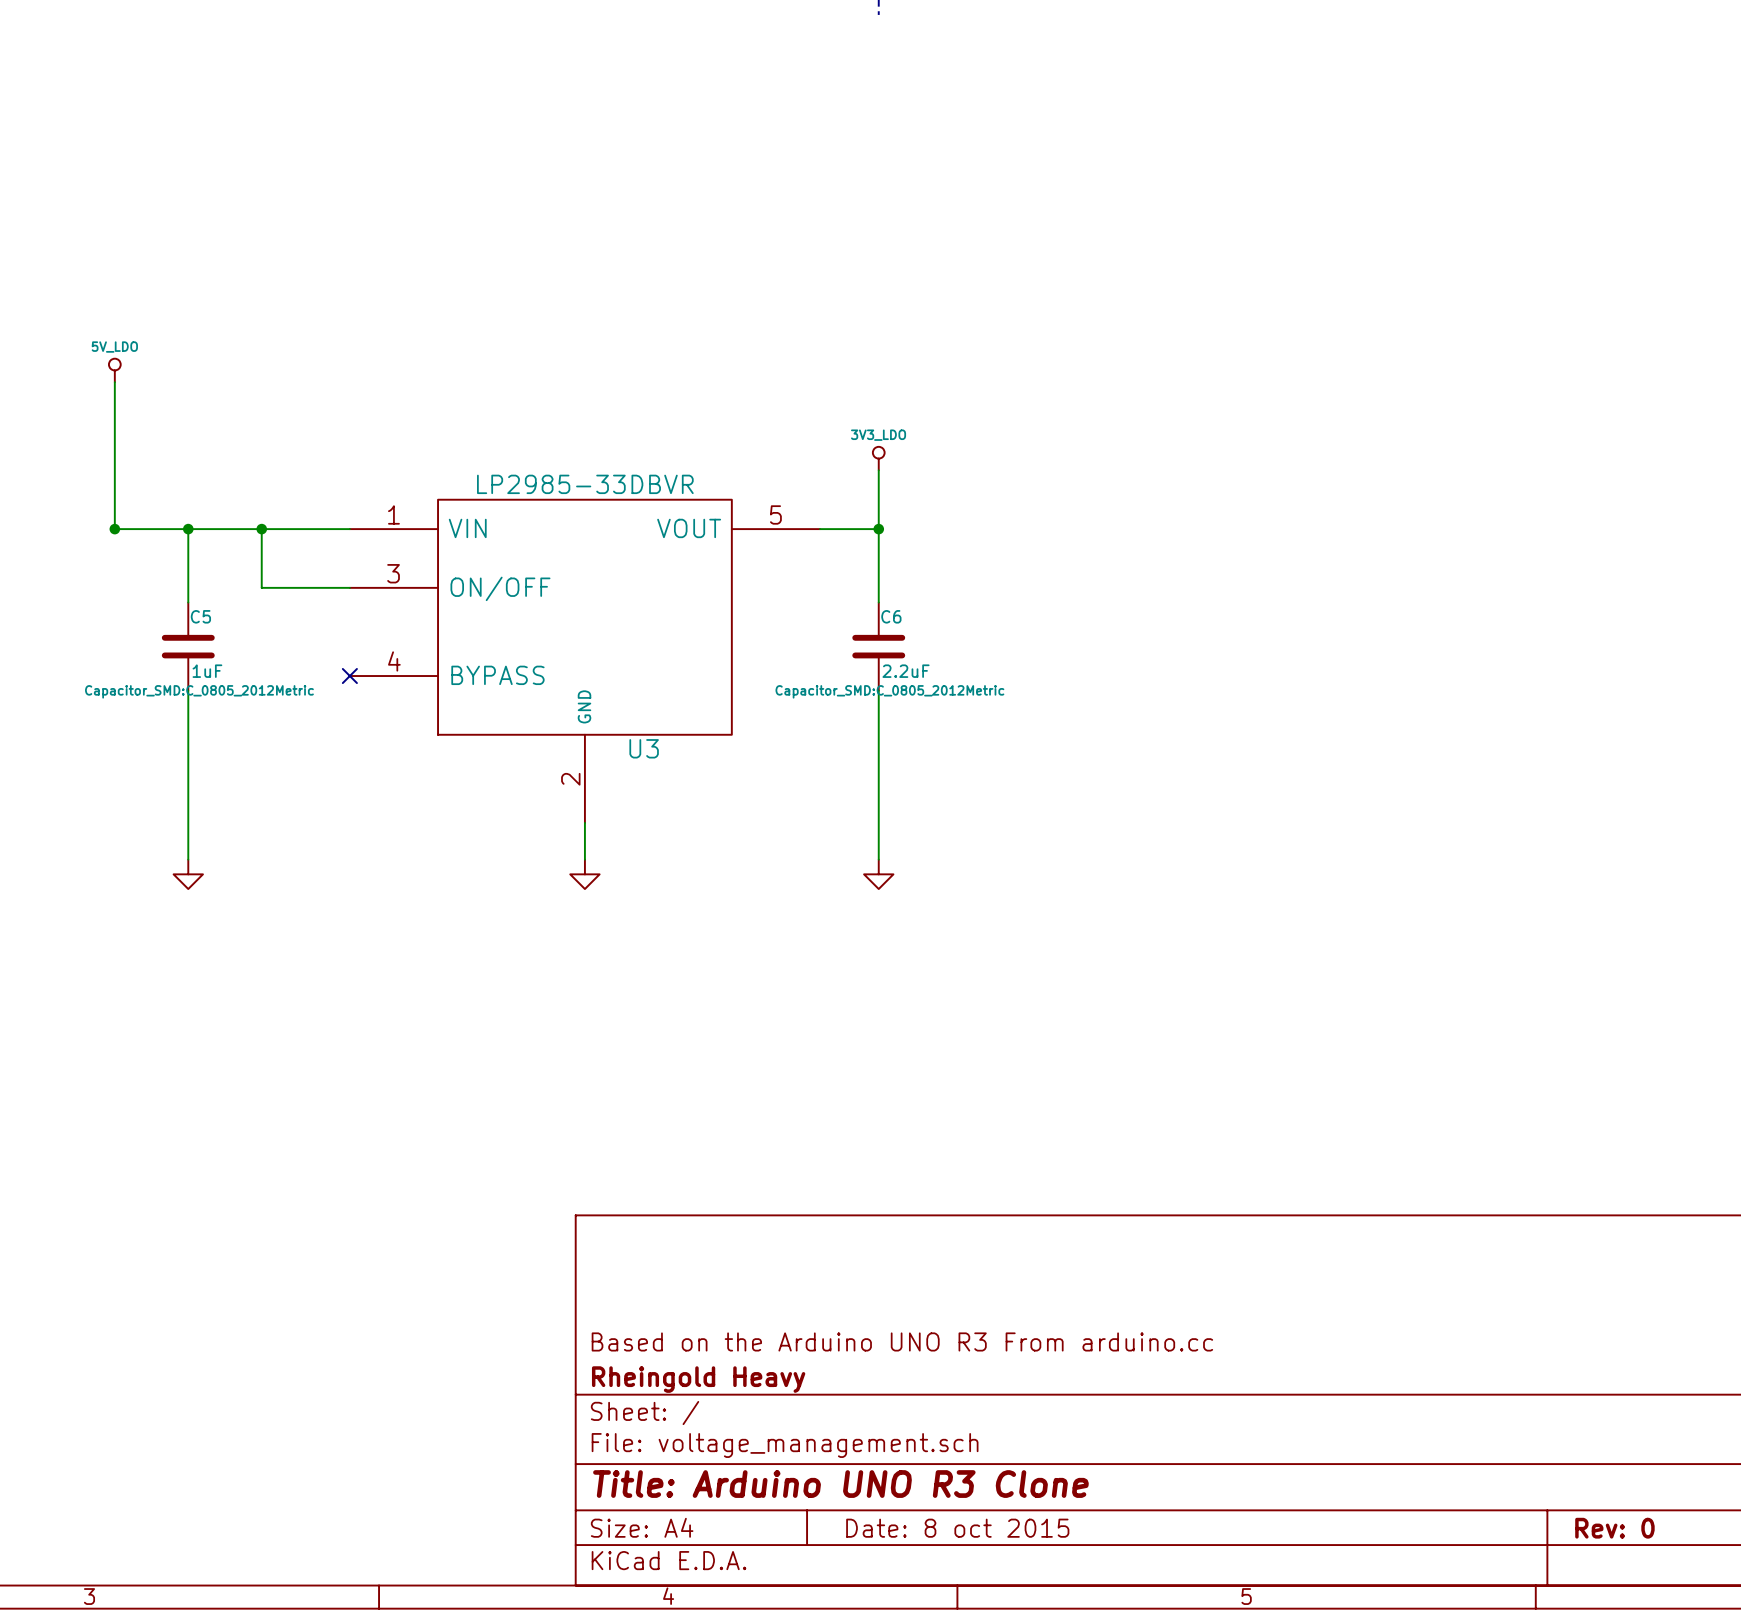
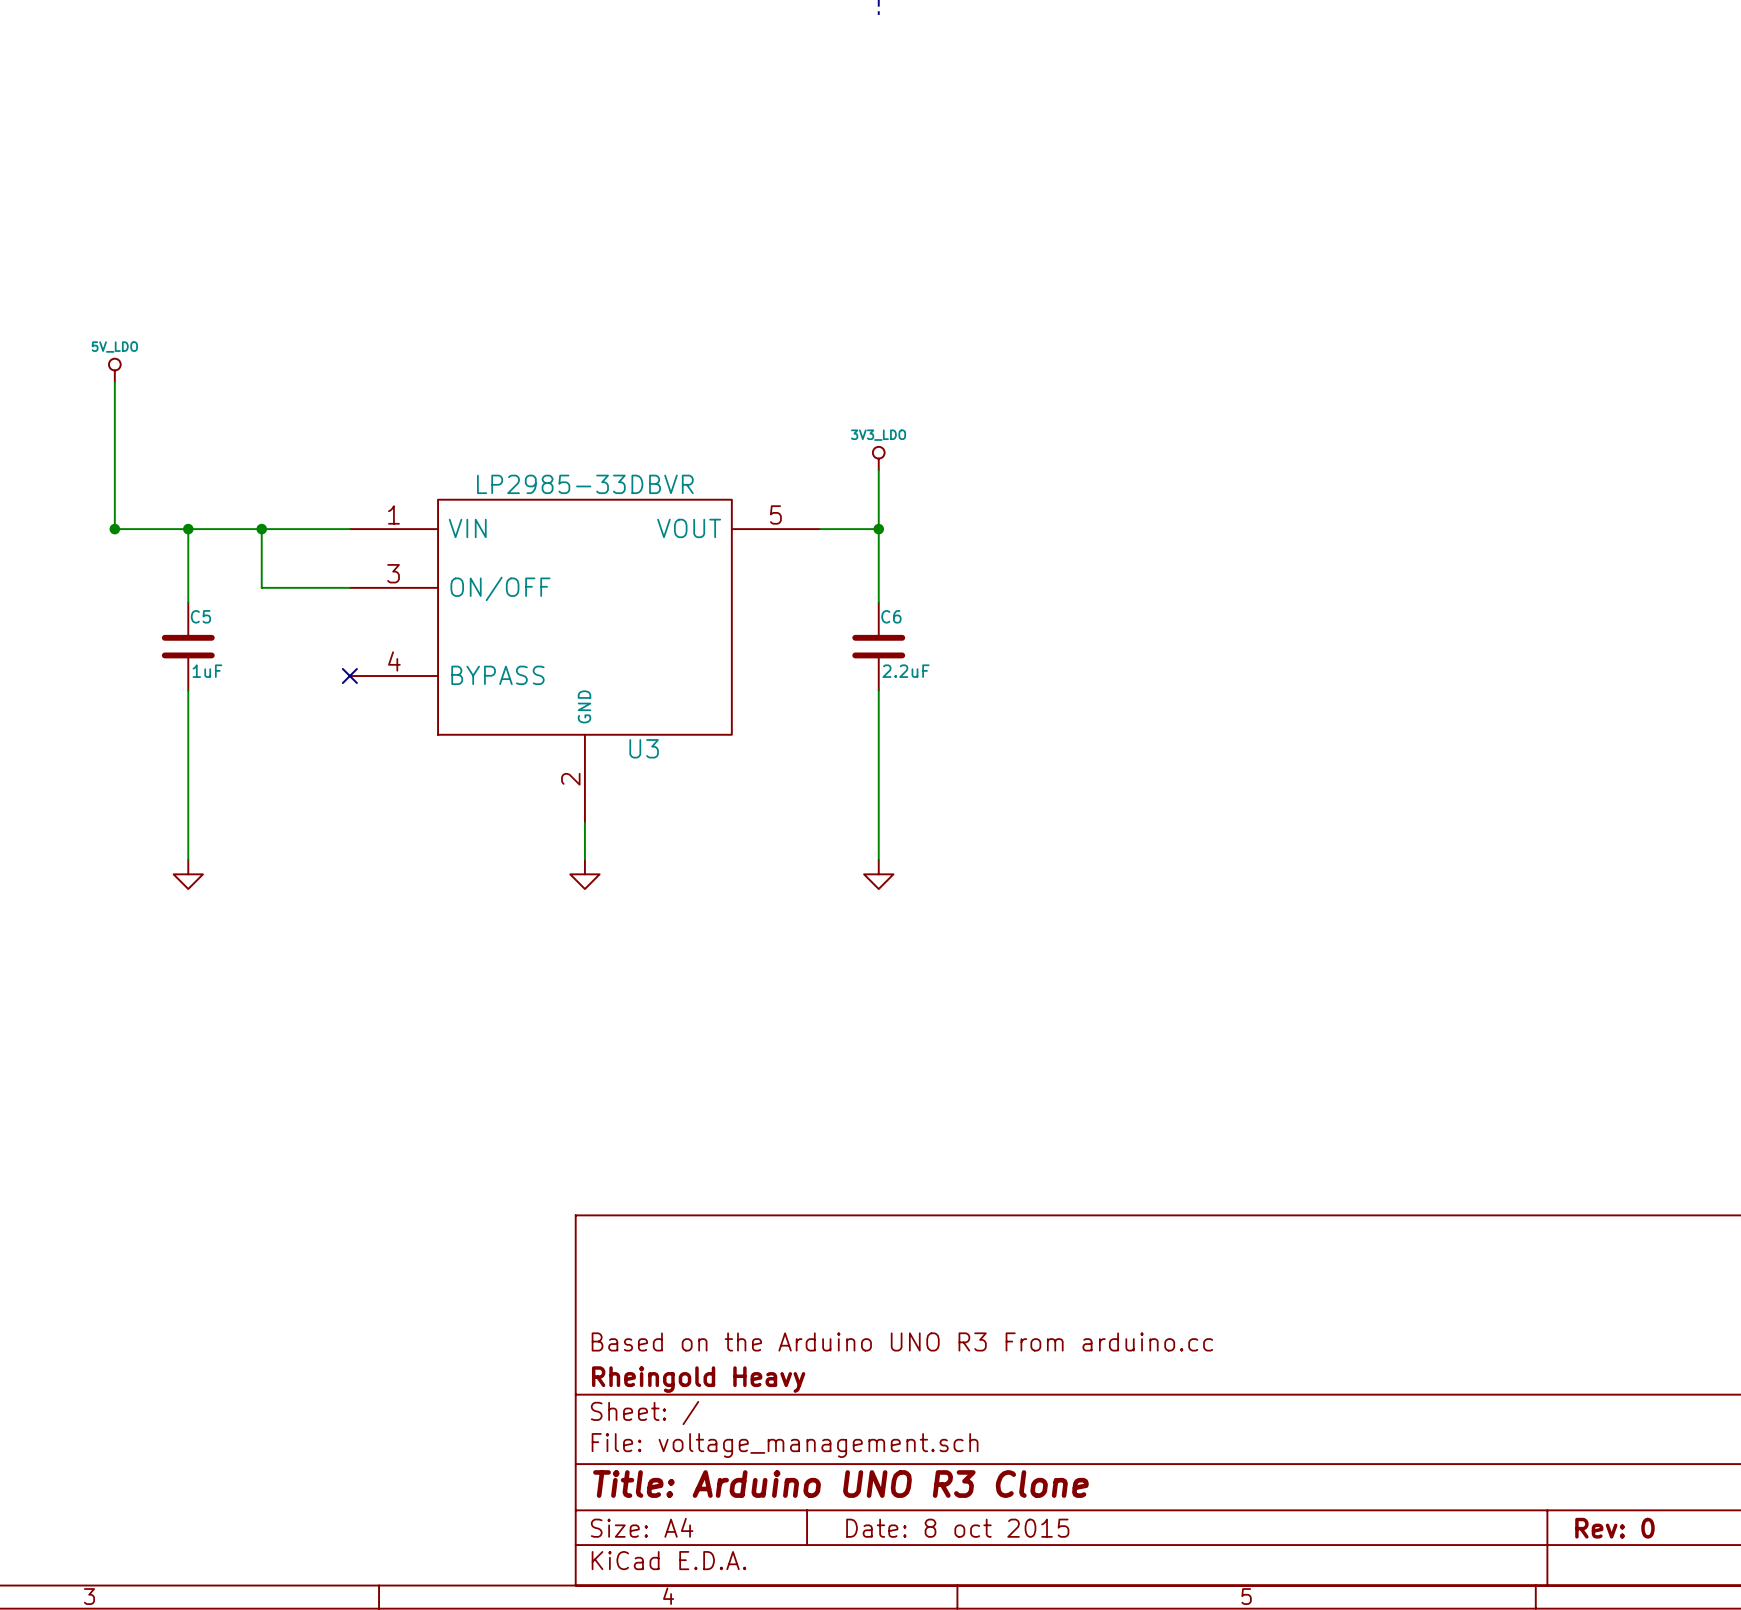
C5 text: Capacitor_SMD:C_0805_2012Metric (199, 691) -> none
C6 text: Capacitor_SMD:C_0805_2012Metric (889, 691) -> none

